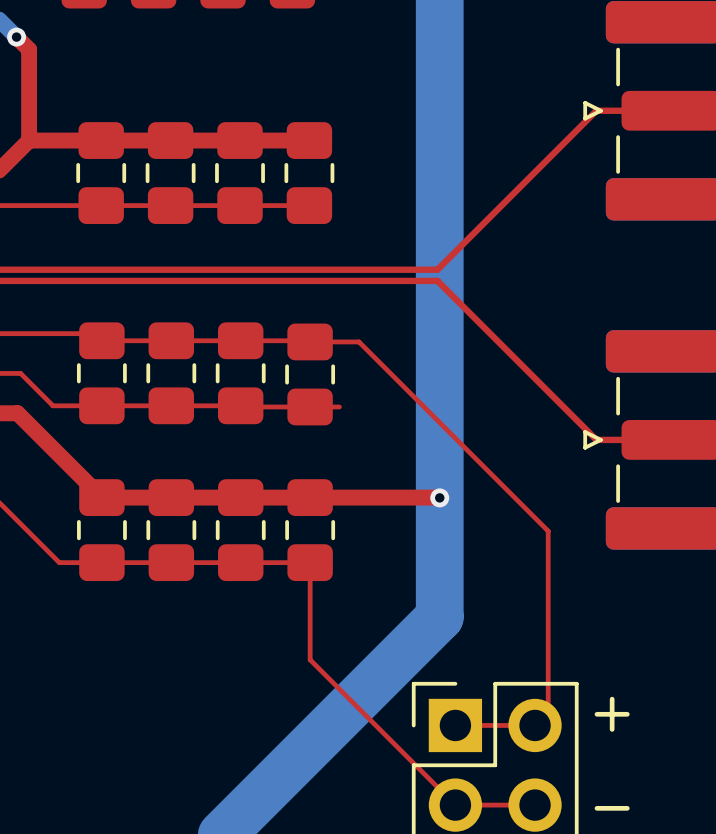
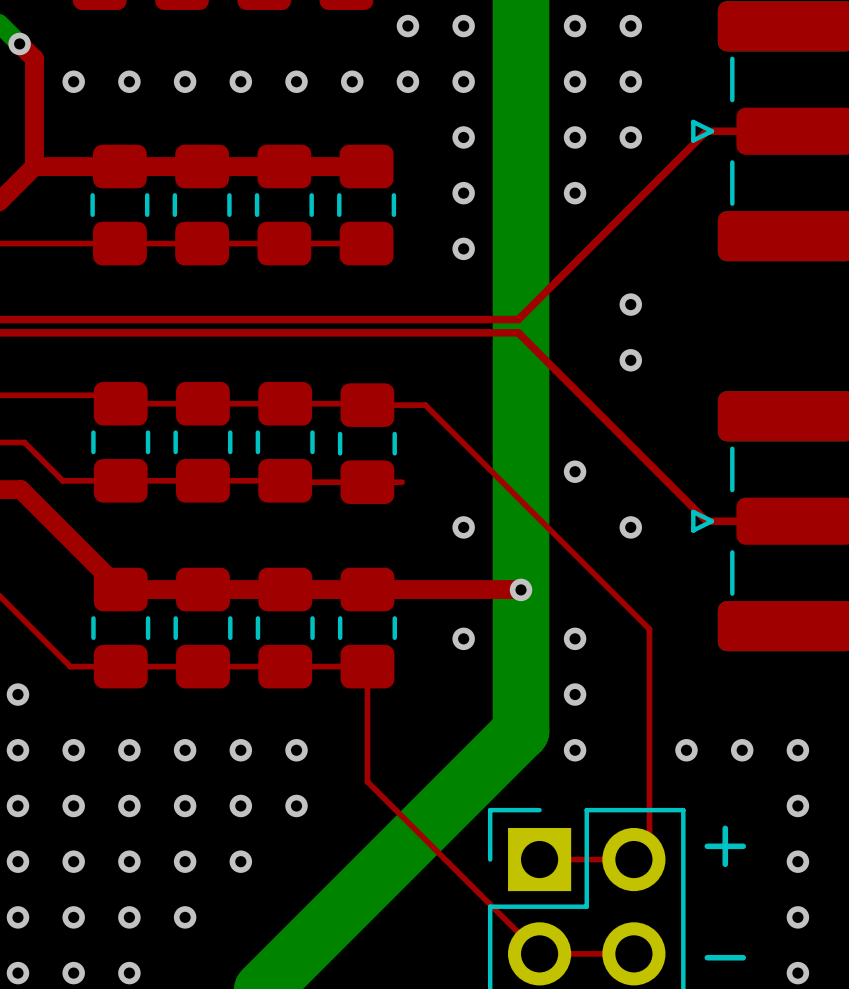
via: none -> (407, 26)
via: none -> (463, 26)
via: none -> (575, 26)
via: none -> (630, 26)
via: none -> (73, 81)
via: none -> (129, 81)
via: none -> (185, 81)
via: none -> (240, 81)
via: none -> (296, 81)
via: none -> (352, 81)
via: none -> (407, 81)
via: none -> (463, 81)
via: none -> (575, 81)
via: none -> (630, 81)
via: none -> (463, 137)
via: none -> (575, 137)
via: none -> (630, 137)
via: none -> (463, 193)
via: none -> (575, 193)
via: none -> (463, 248)
via: none -> (630, 304)
via: none -> (630, 360)
via: none -> (575, 471)
via: none -> (463, 527)
via: none -> (630, 527)
via: none -> (463, 638)
via: none -> (575, 638)
via: none -> (17, 694)
via: none -> (575, 694)
via: none -> (17, 750)
via: none -> (73, 750)
via: none -> (129, 750)
via: none -> (185, 750)
via: none -> (240, 750)
via: none -> (296, 750)
via: none -> (575, 750)
via: none -> (686, 750)
via: none -> (742, 750)
via: none -> (797, 750)
via: none -> (17, 805)
via: none -> (73, 805)
via: none -> (129, 805)
via: none -> (185, 805)
via: none -> (240, 805)
via: none -> (296, 805)
via: none -> (797, 805)
via: none -> (17, 861)
via: none -> (73, 861)
via: none -> (129, 861)
via: none -> (185, 861)
via: none -> (240, 861)
via: none -> (797, 861)
via: none -> (17, 917)
via: none -> (73, 917)
via: none -> (129, 917)
via: none -> (185, 917)
via: none -> (797, 917)
via: none -> (17, 973)
via: none -> (73, 973)
via: none -> (129, 973)
via: none -> (797, 973)

